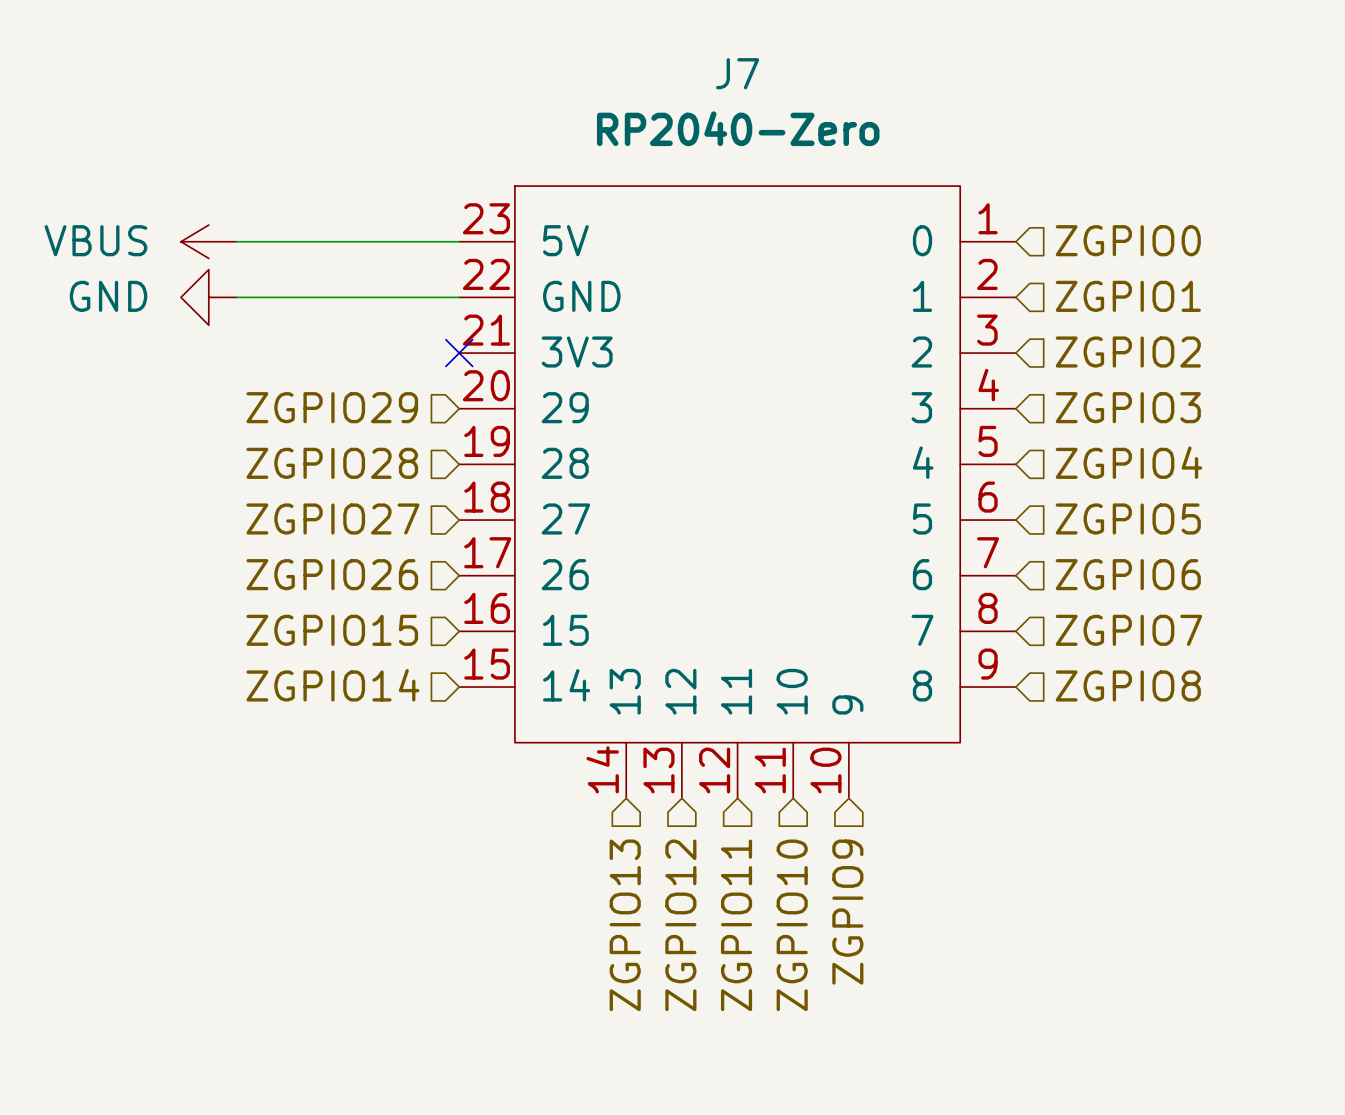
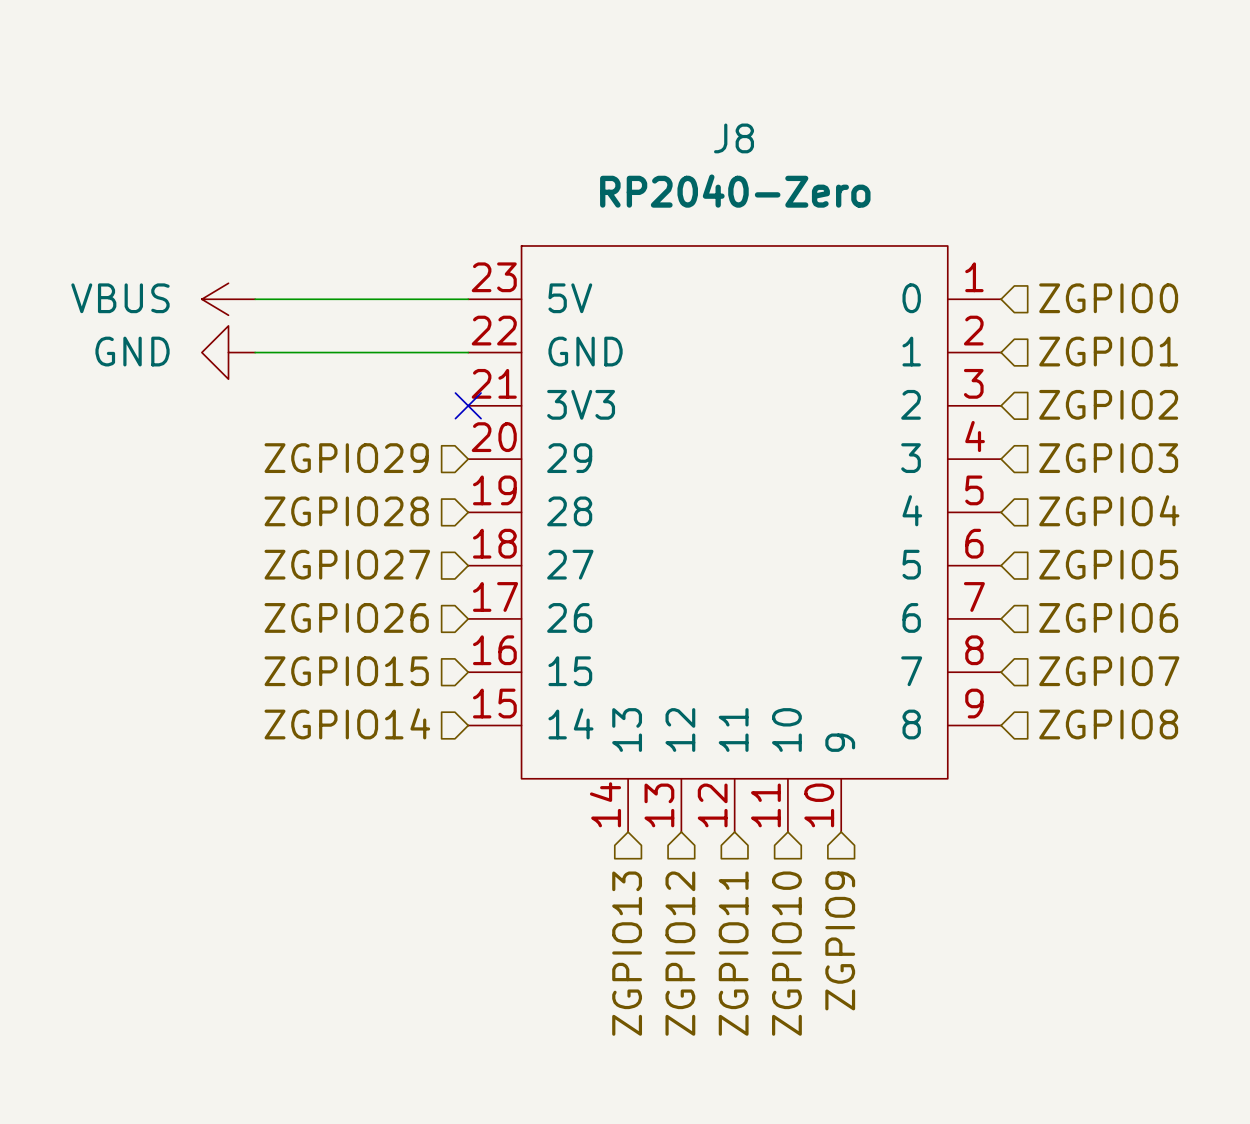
J7 name: J7 (737, 73) -> J8 (734, 138)

